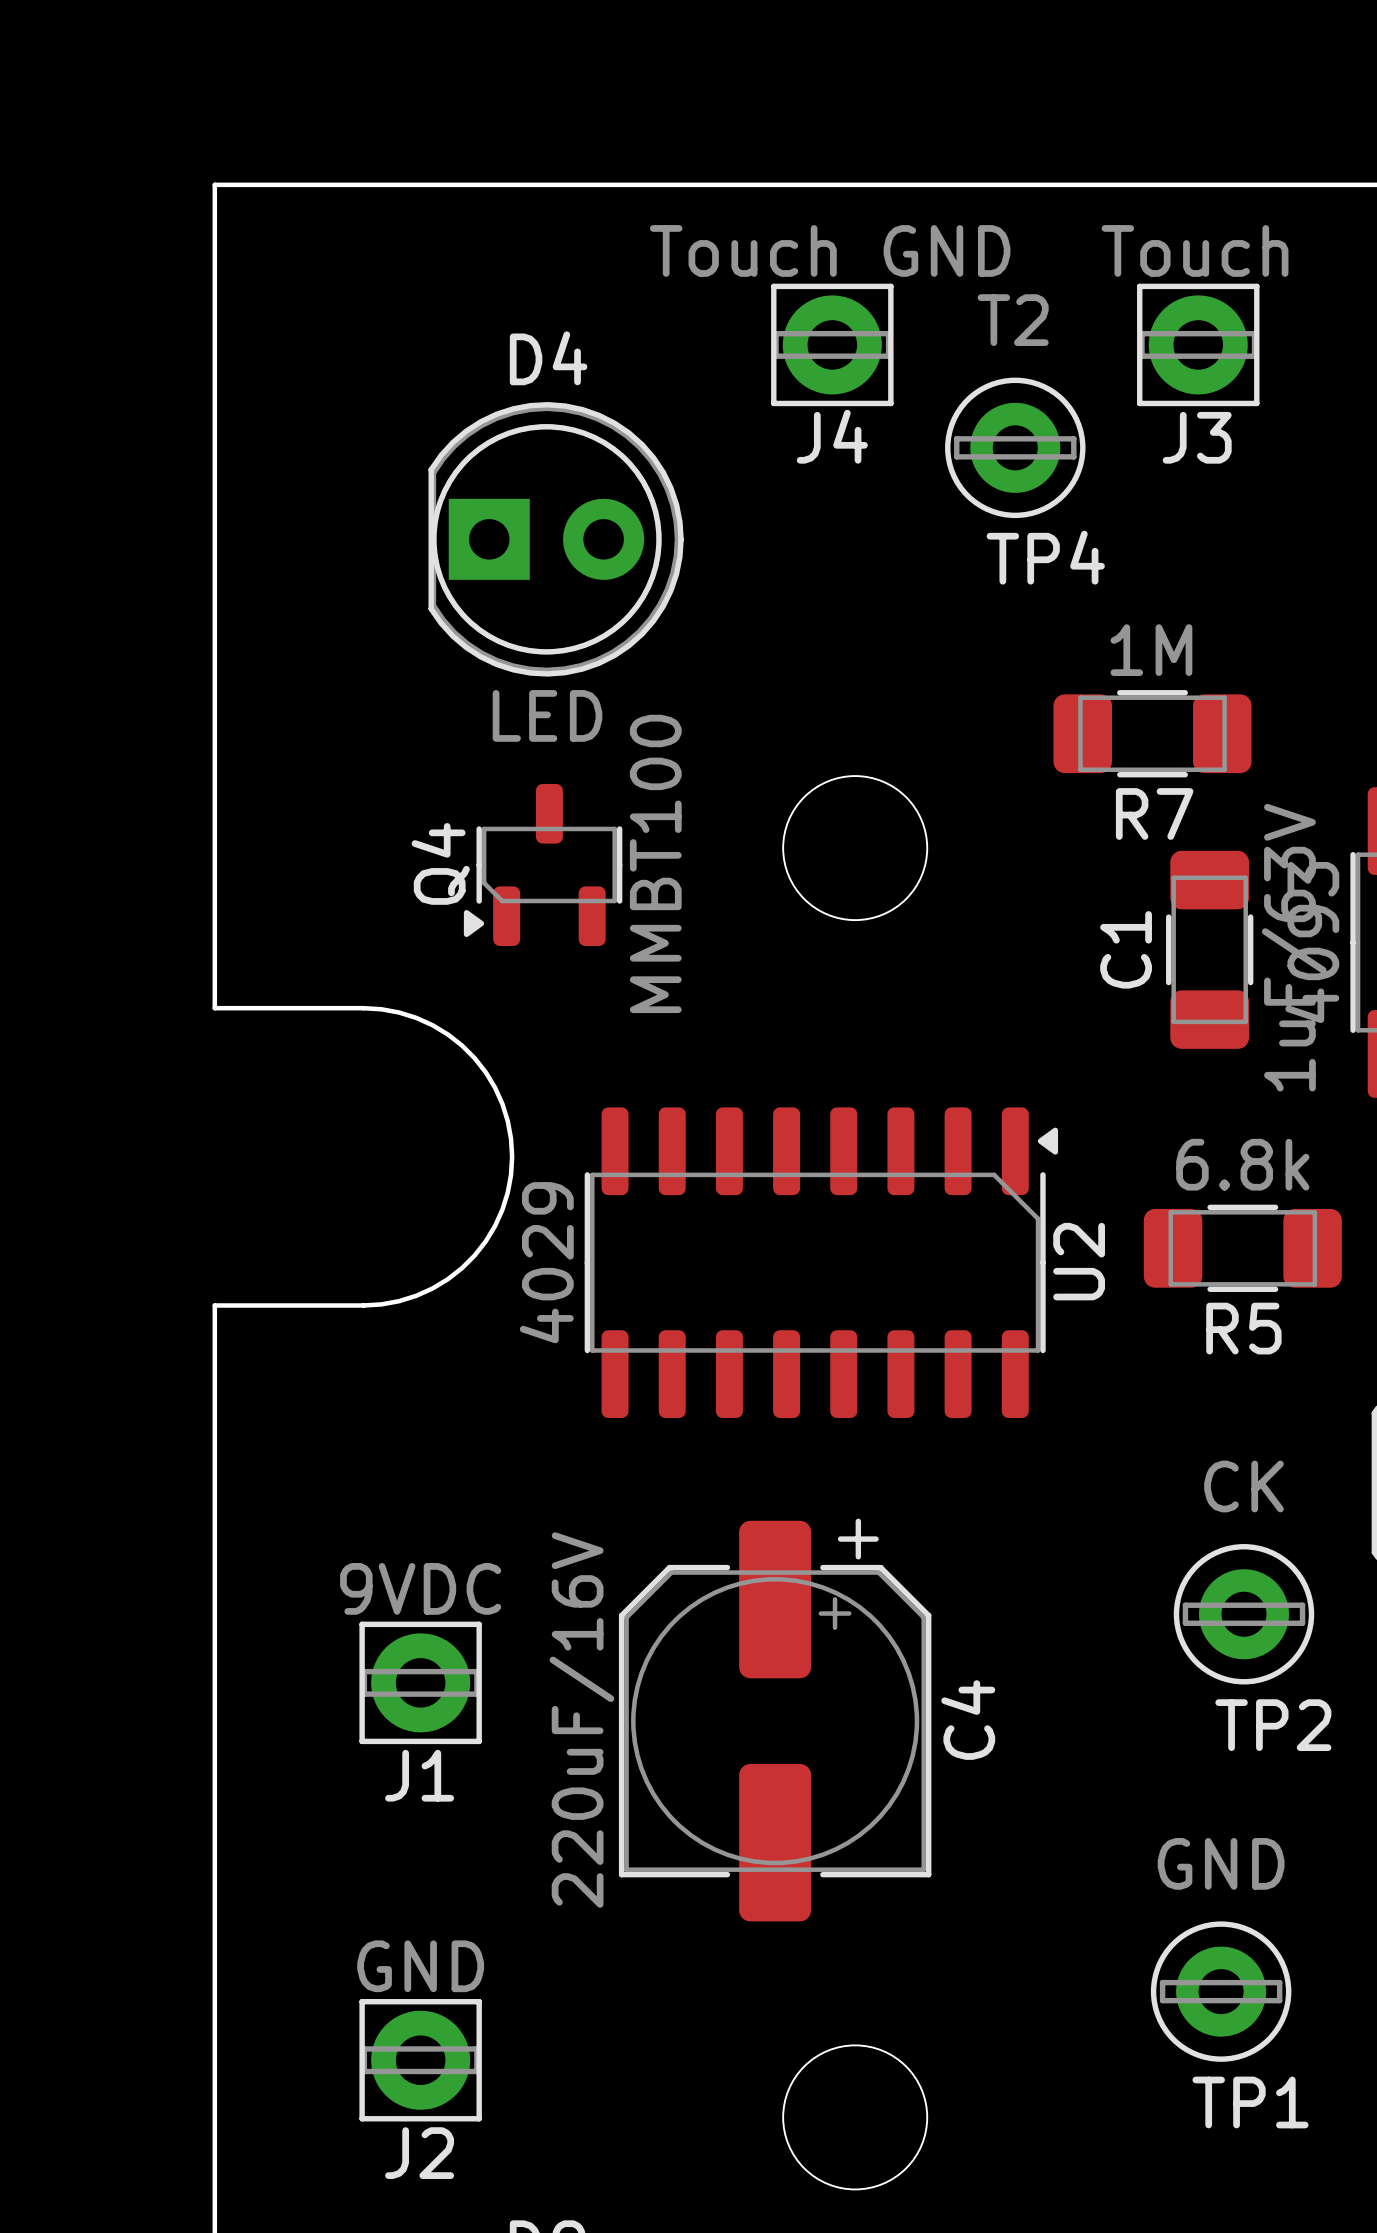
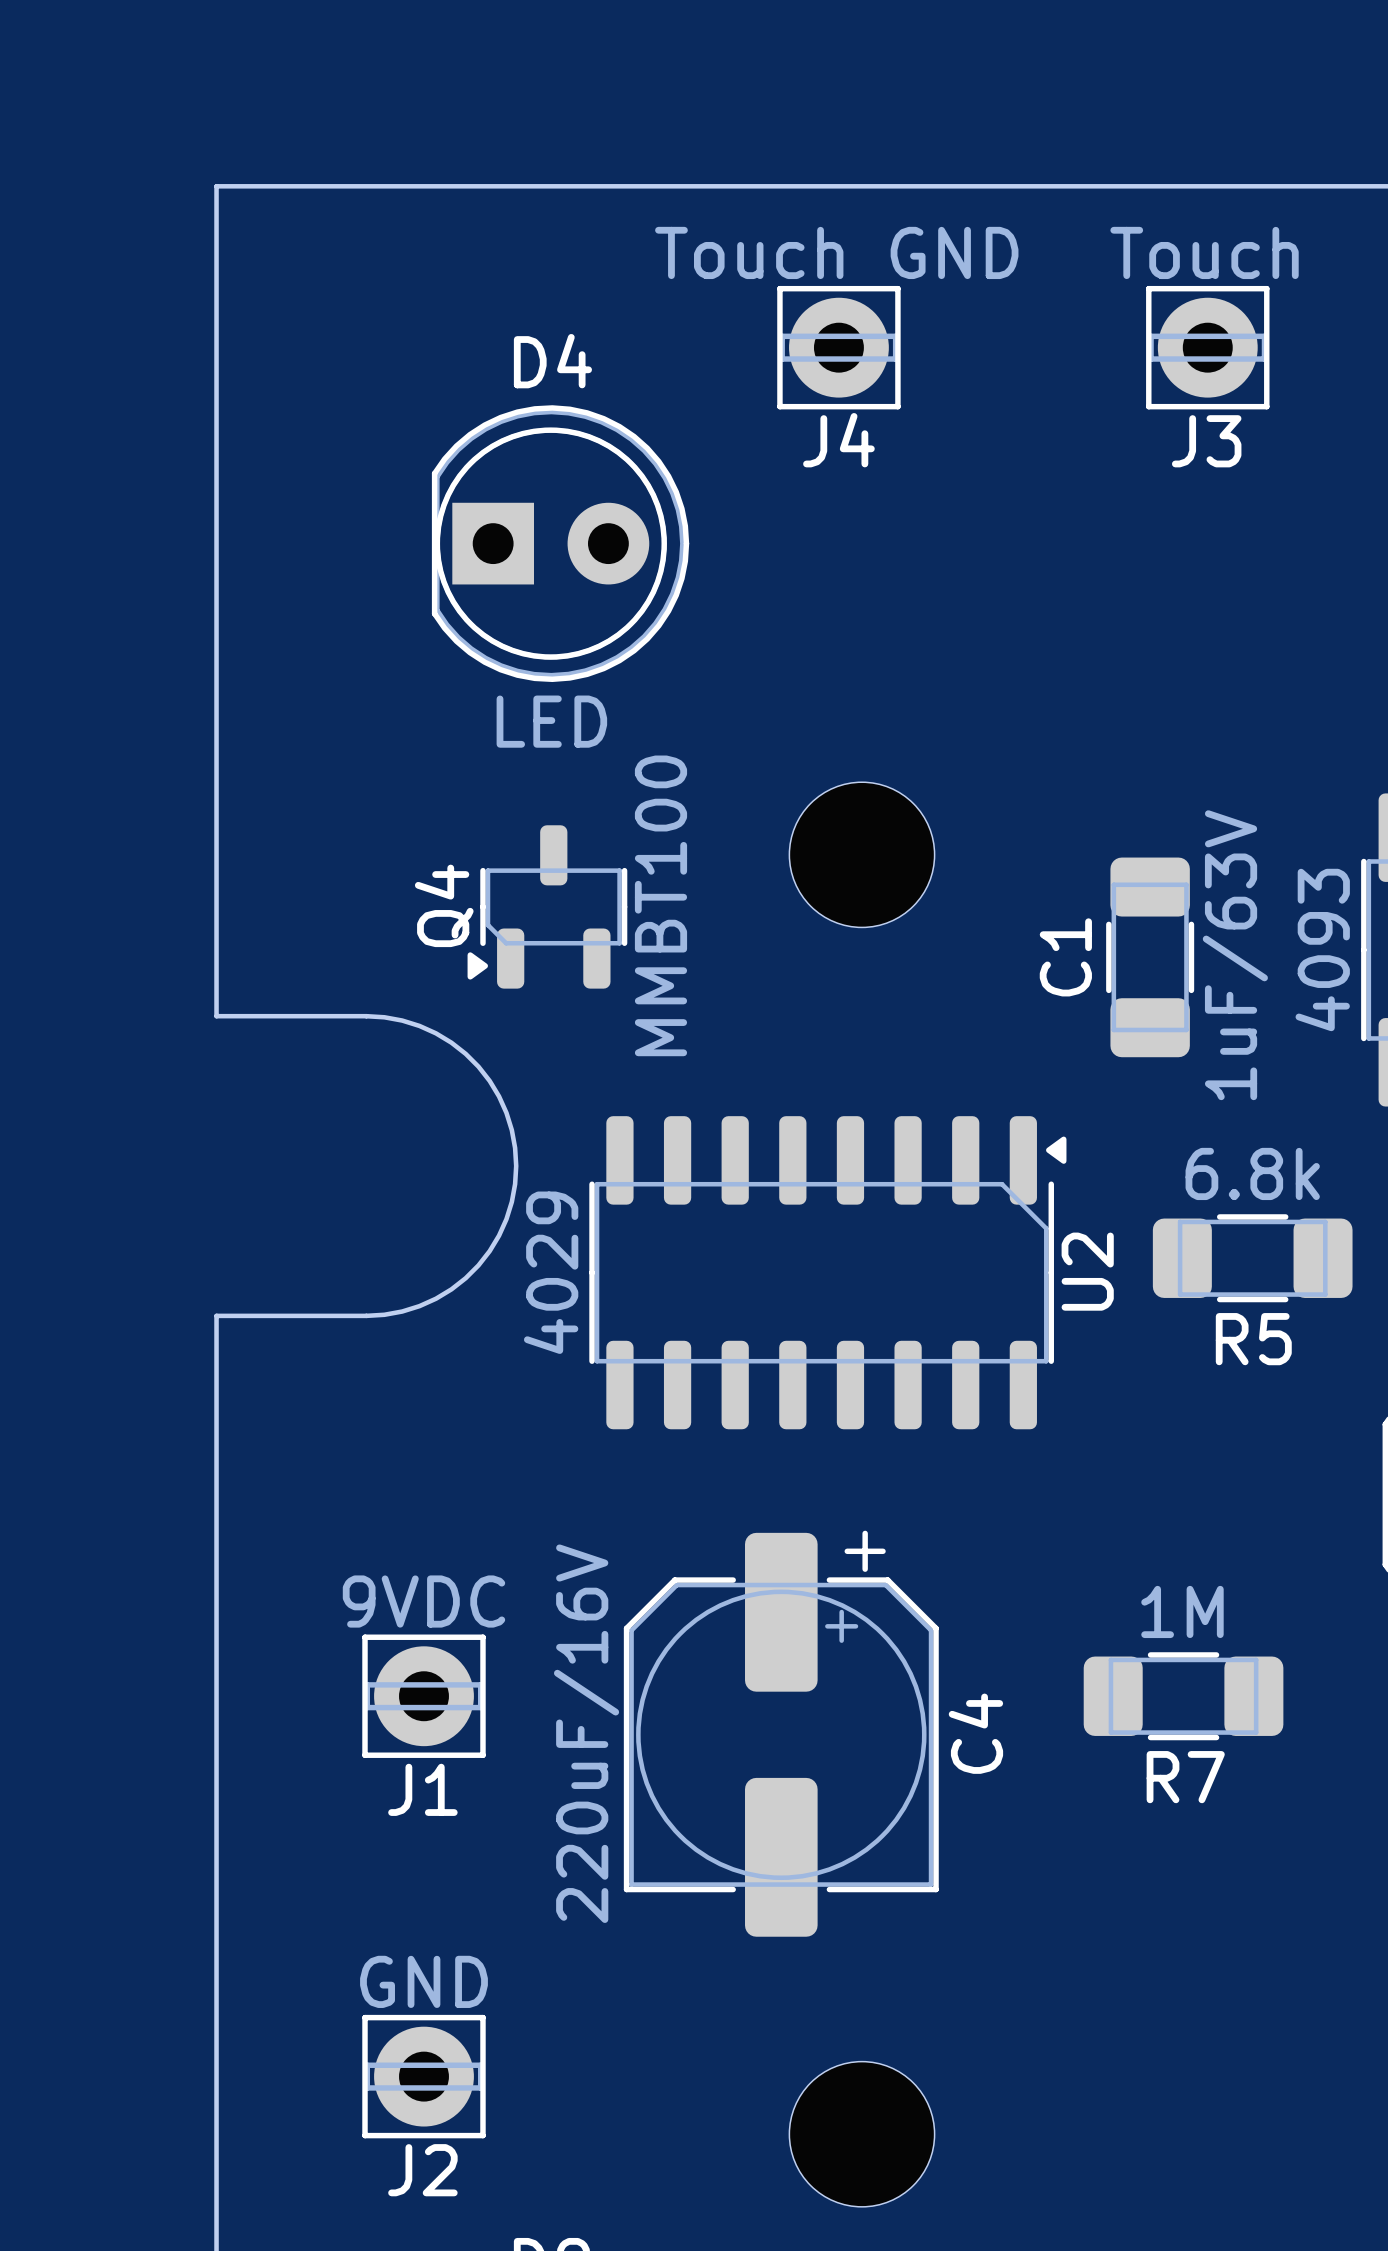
TP4: T2 (1015, 447) -> none
R7 position: (1152, 733) -> (1183, 1696)
Q4 position: (543, 864) -> (547, 906)
C1 position: (1209, 949) -> (1150, 957)
TP2: CK (1243, 1614) -> none
TP1: GND (1221, 1991) -> none

